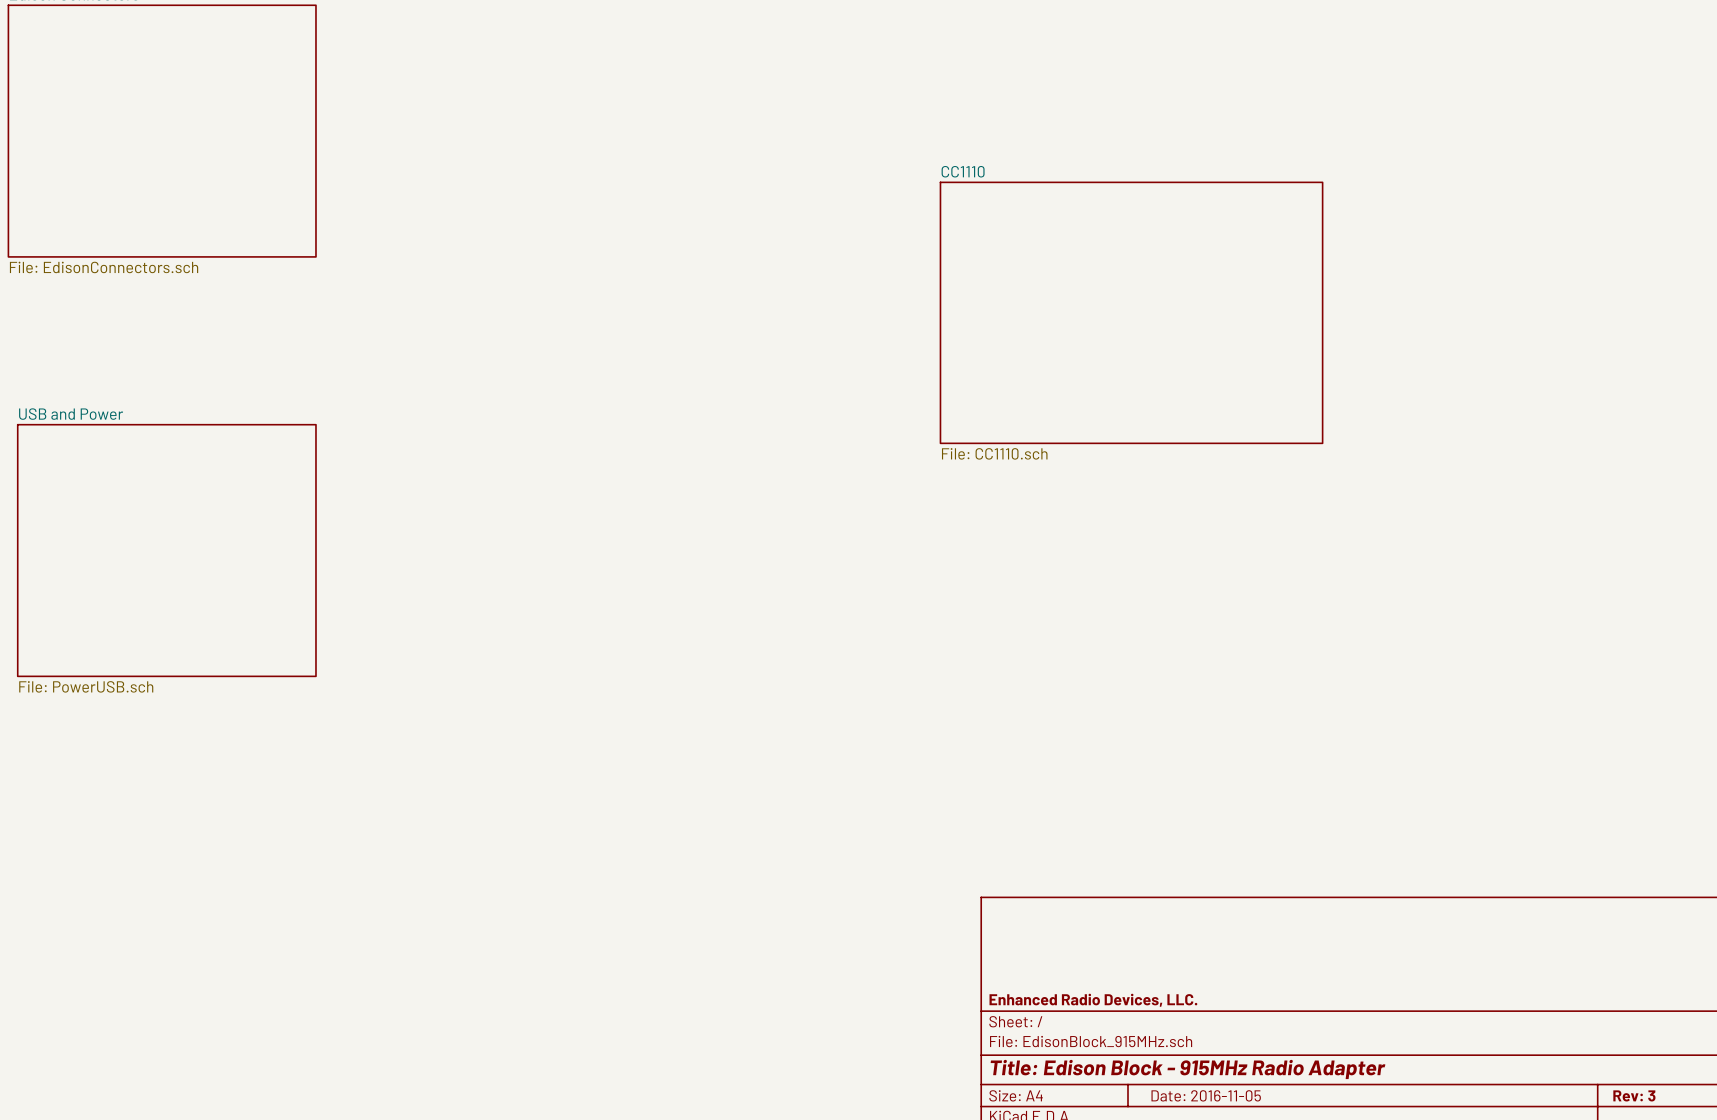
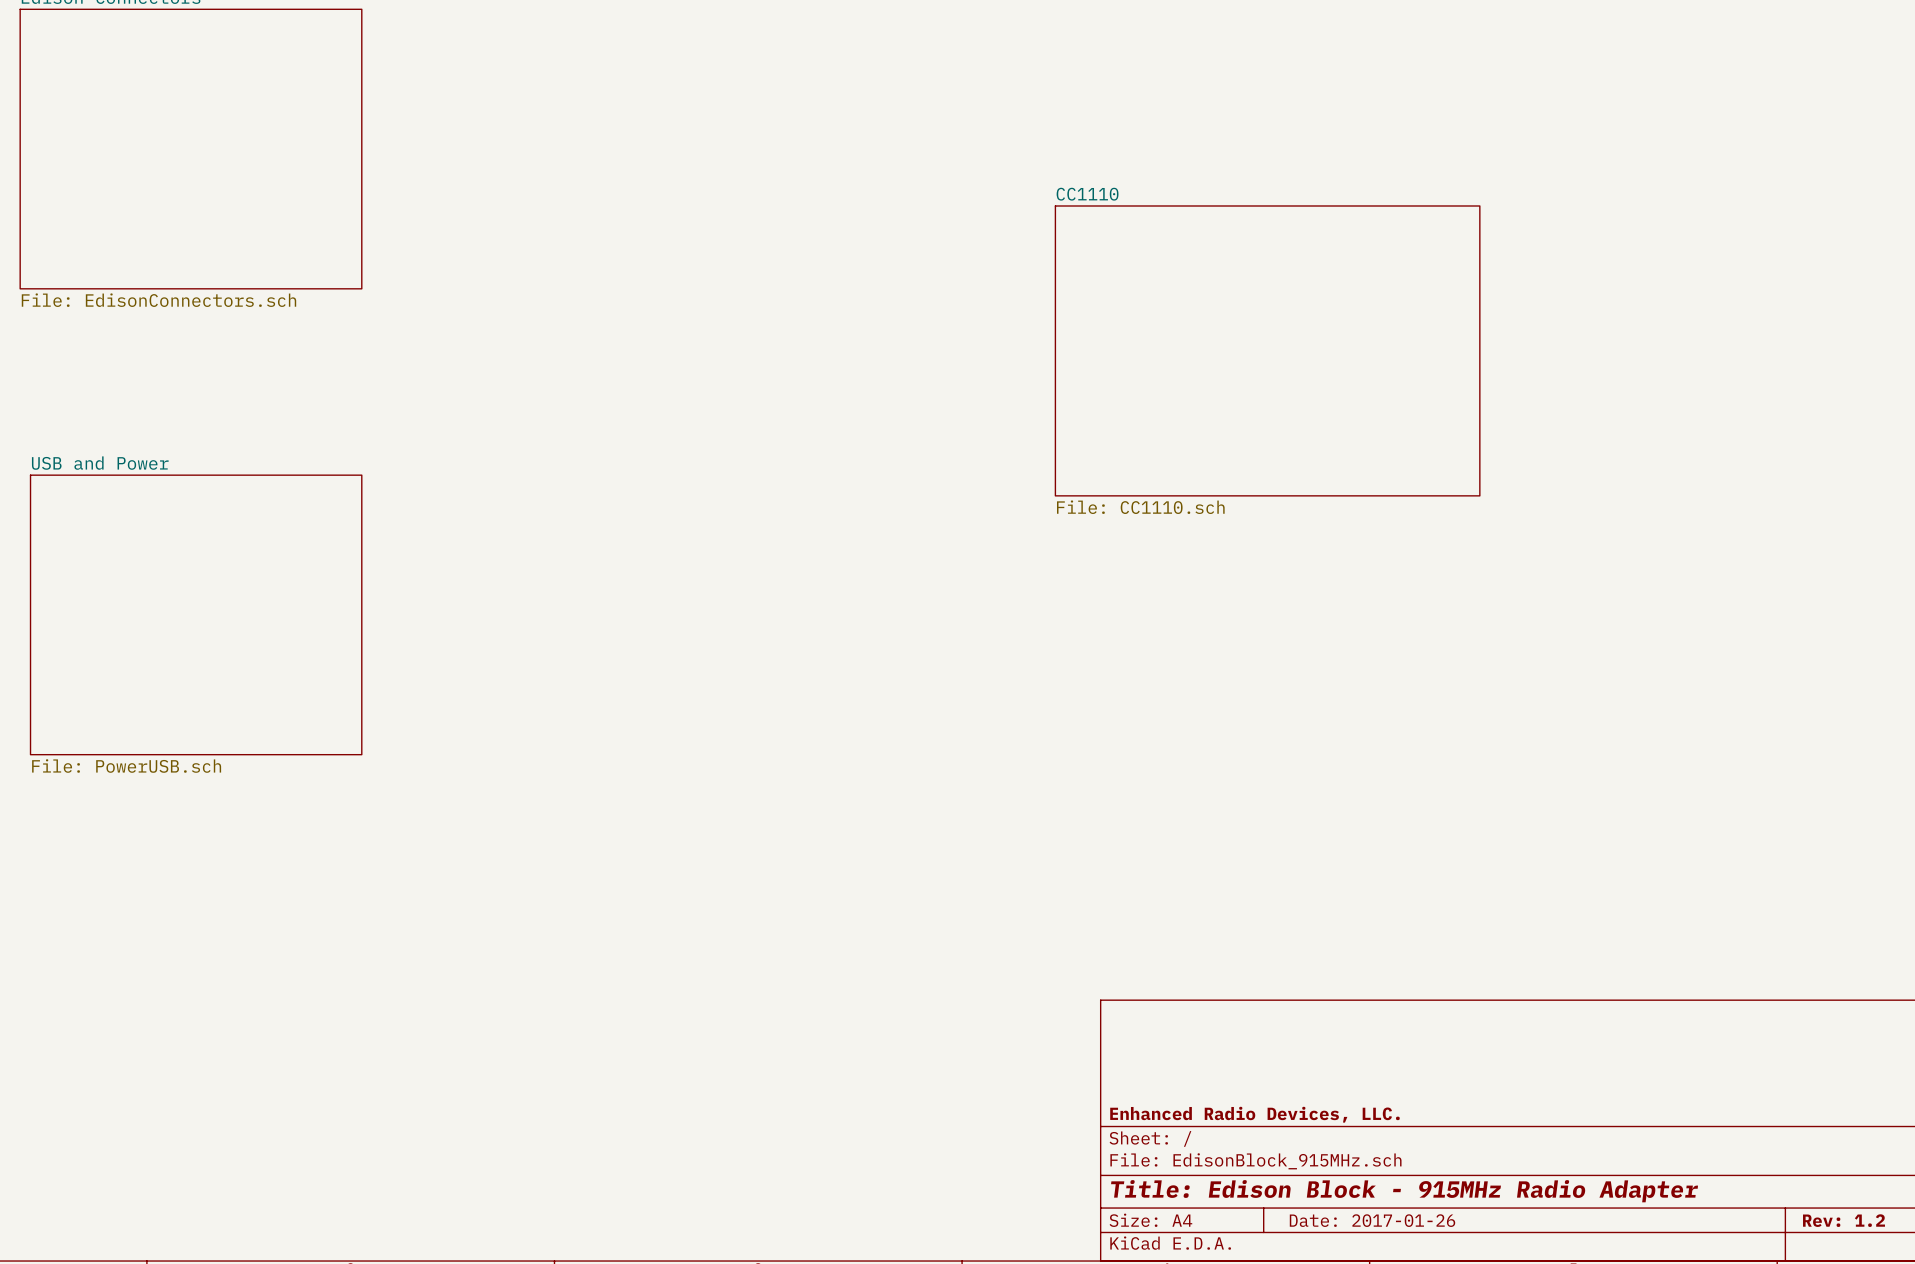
title block: Date: 2016-11-05 (1206, 1095) -> Date: 2017-01-26 (1372, 1220)
title block: Rev: 3 (1634, 1095) -> Rev: 1.2 (1844, 1220)

